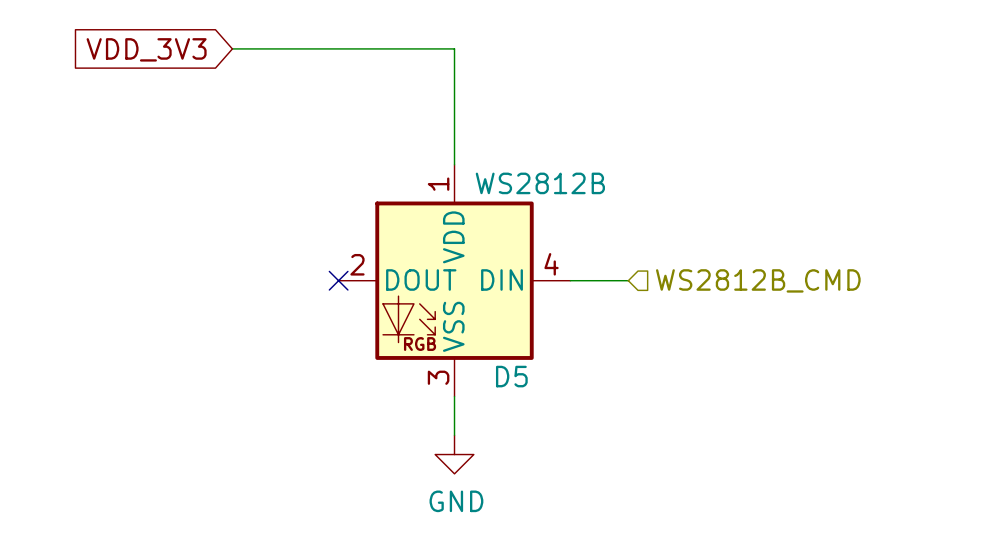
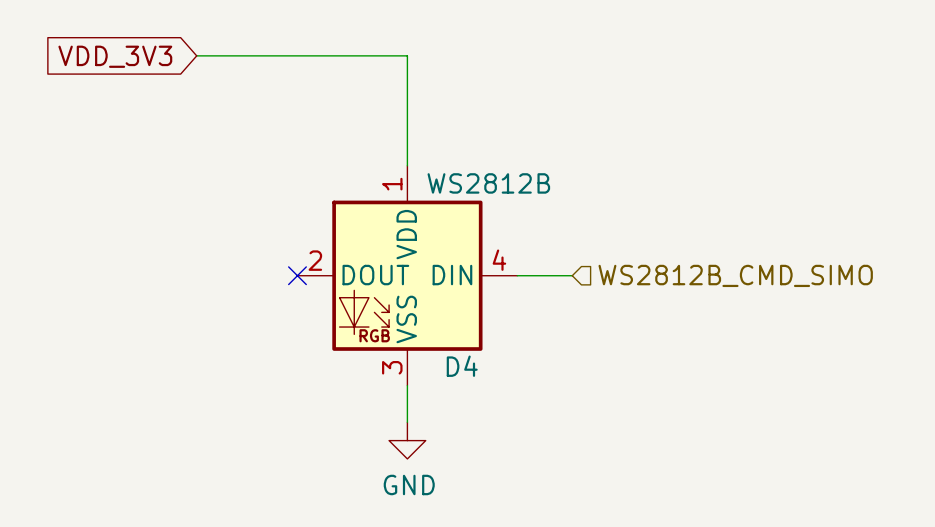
hierarchical label: WS2812B_CMD (758, 280) -> WS2812B_CMD_SIMO (735, 275)
D5 name: D5 (511, 376) -> D4 (462, 366)

